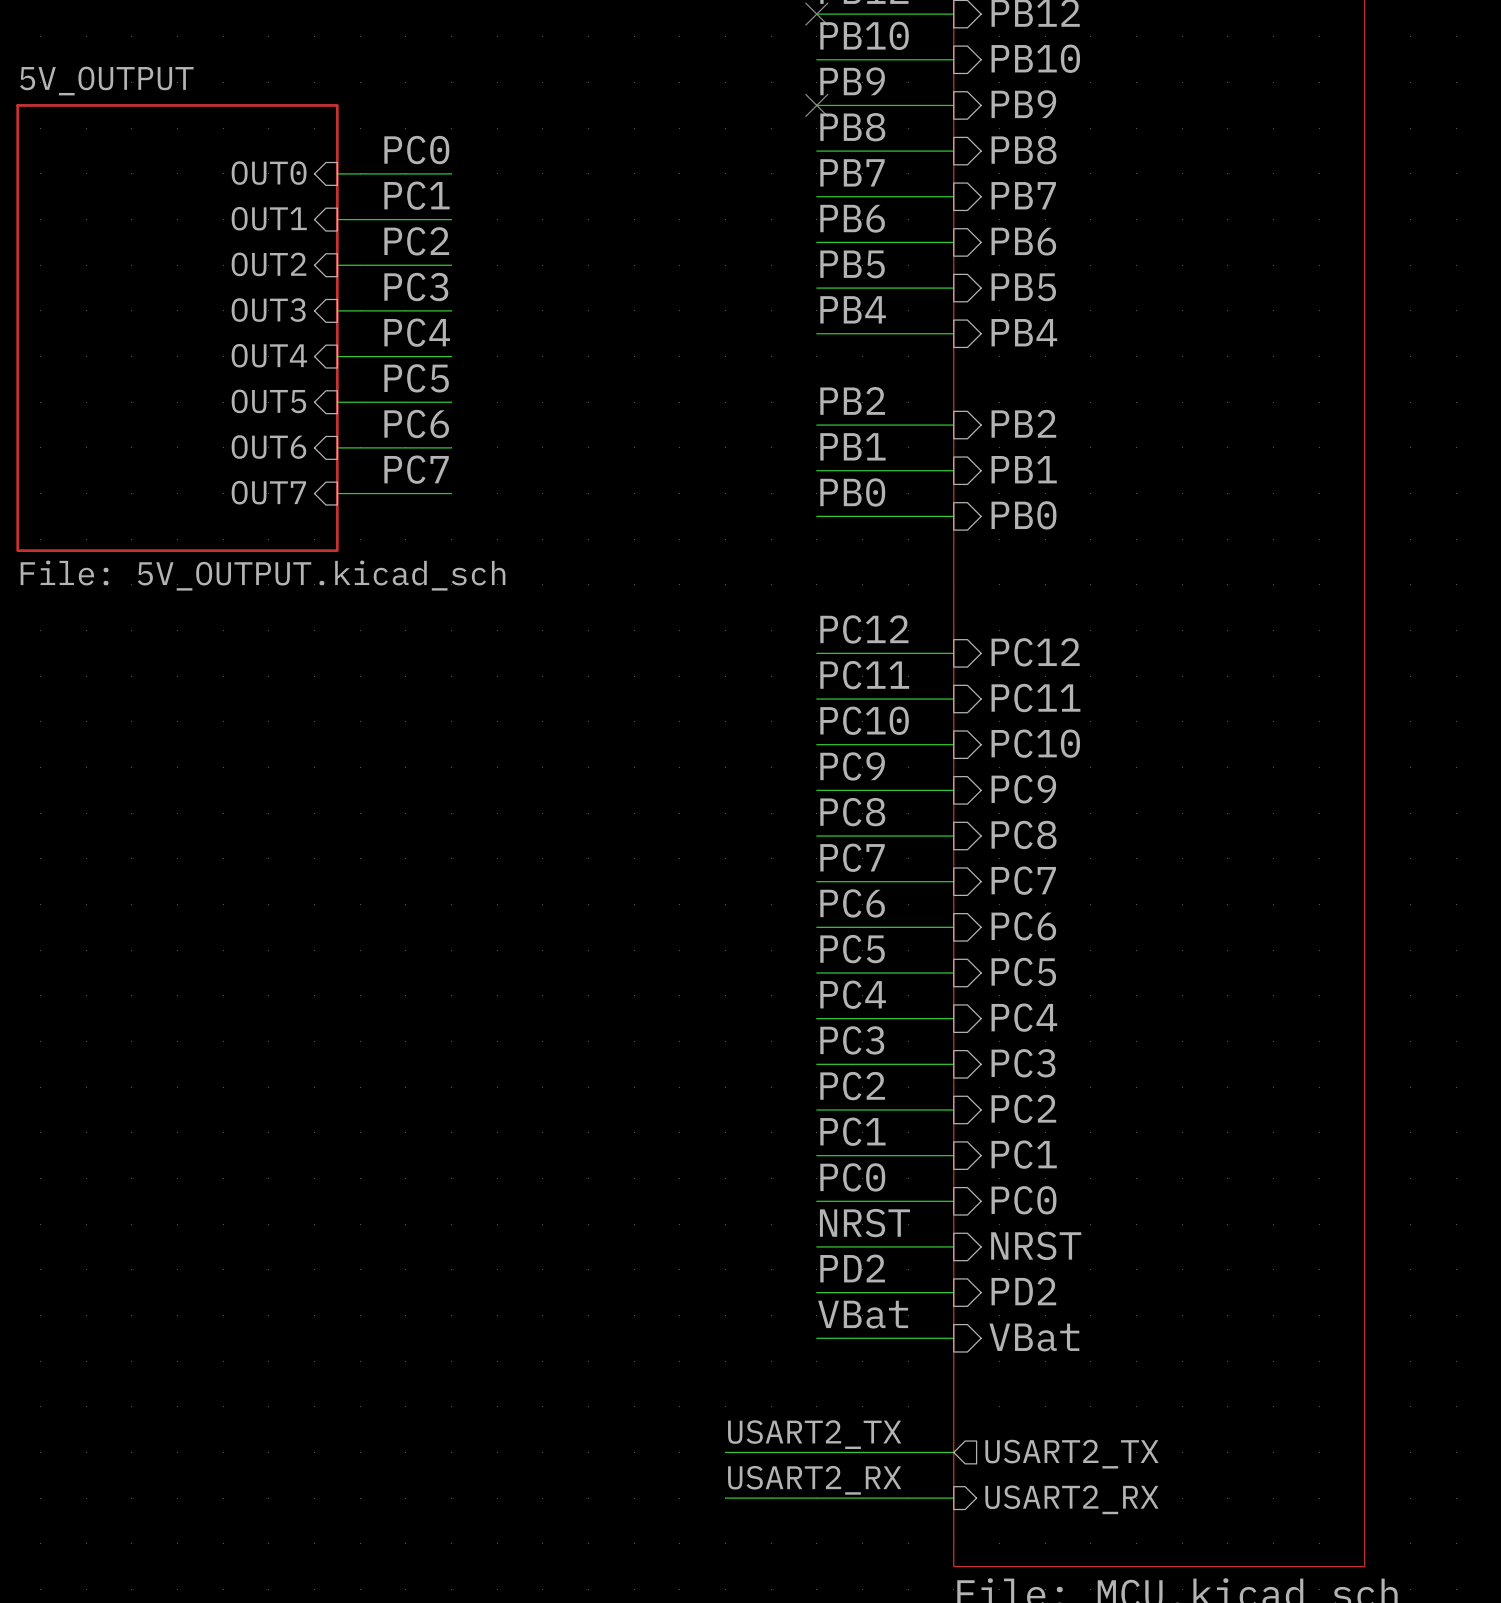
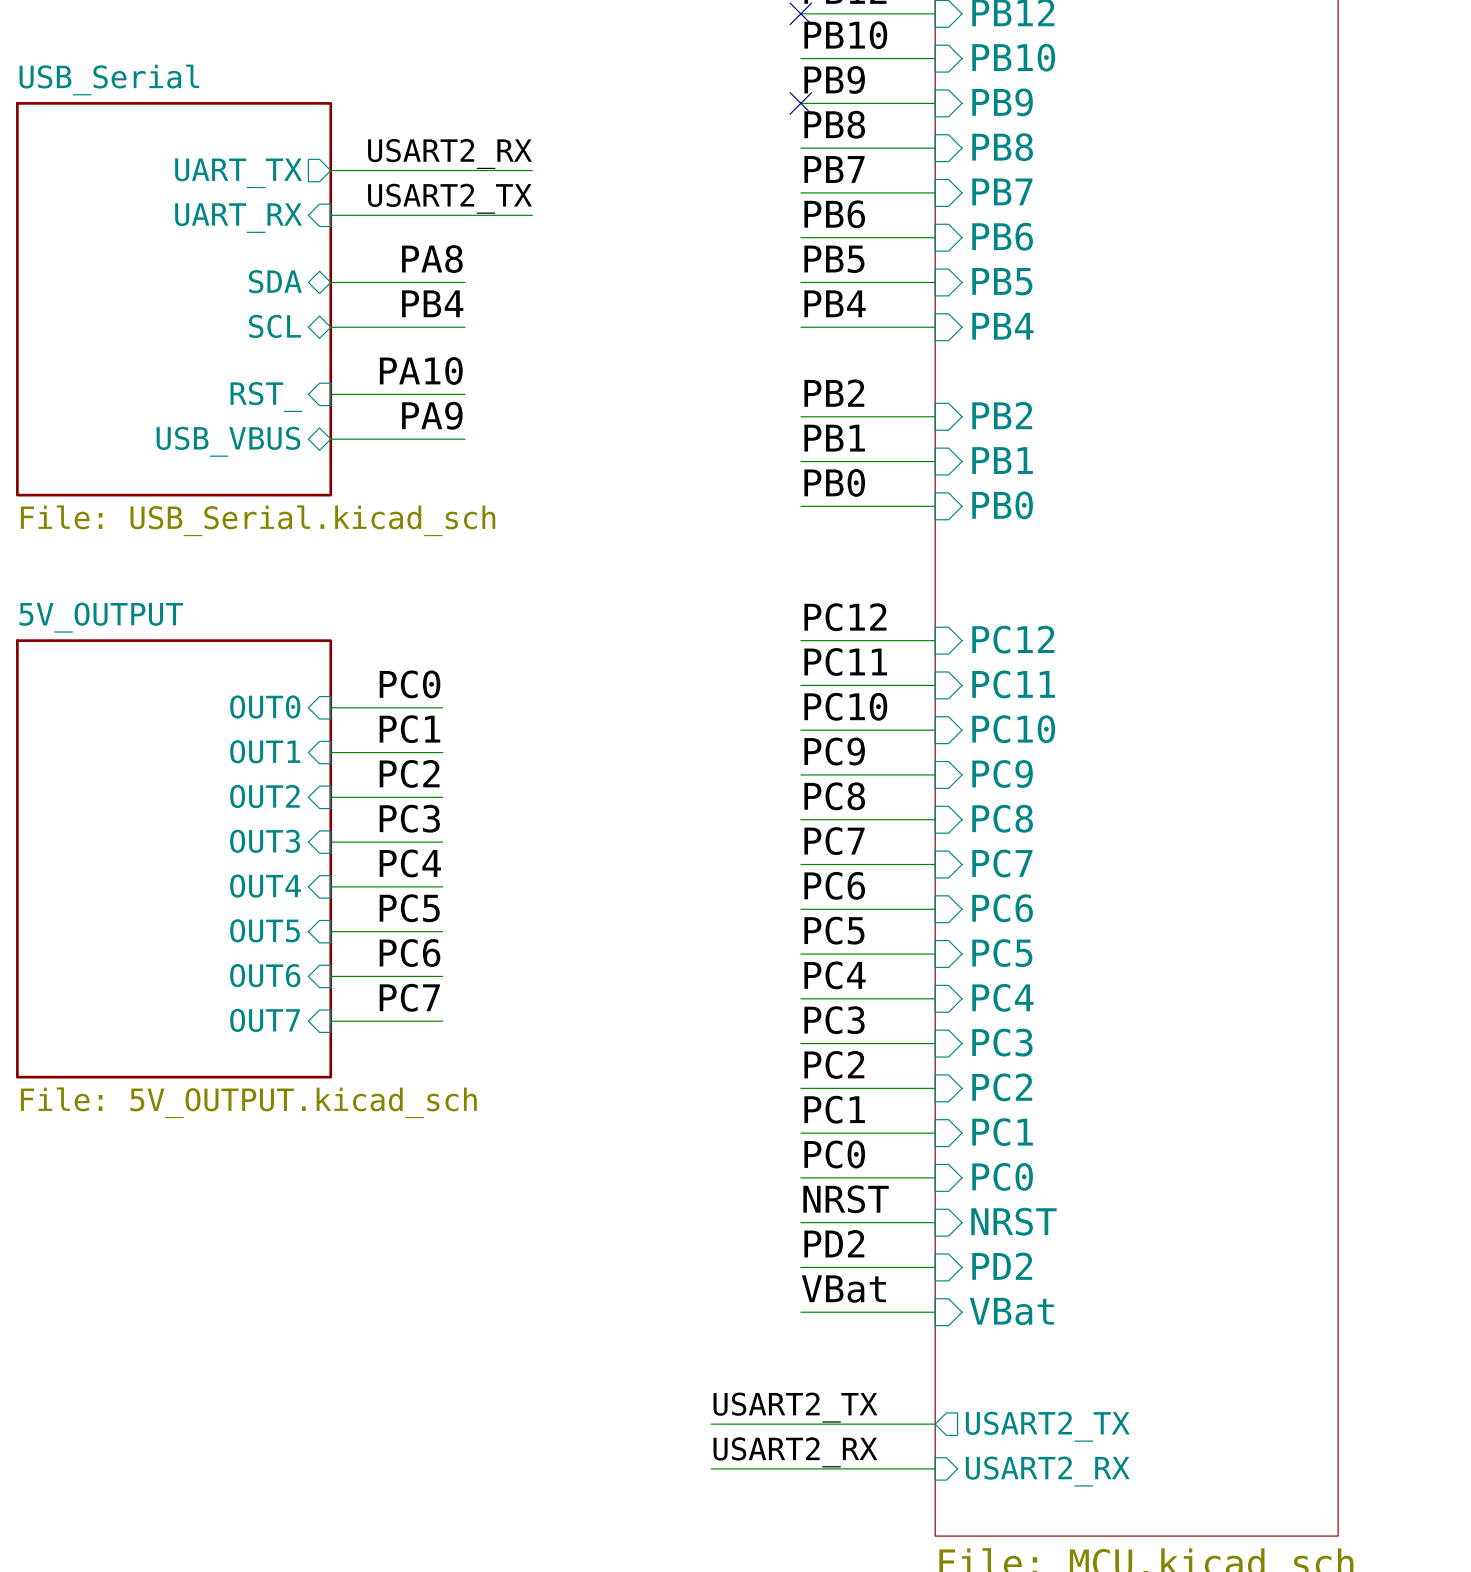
label: PC0 (416, 150) -> none
label: none -> USART2_RX (450, 153)
sheet pin shape: input (269, 173) -> output (238, 173)
sheet pin: OUT0 (269, 173) -> UART_TX (238, 173)
wire: none -> (442, 170) (532, 170)
label: PC1 (417, 195) -> none
label: none -> USART2_TX (450, 198)
sheet pin: OUT1 (269, 218) -> UART_RX (238, 218)
wire: none -> (442, 215) (532, 215)
label: PC2 (416, 241) -> none
sheet pin: OUT2 (268, 264) -> none
label: none -> PA8 (432, 259)
wire: (337, 265) (451, 265) -> none
sheet pin: none -> SDA (275, 281)
label: PC3 (416, 287) -> none
wire: none -> (330, 282) (465, 282)
sheet USB_Serial: none -> File: USB_Serial.kicad_sch (174, 299)
sheet pin: OUT3 (268, 310) -> none
wire: (337, 310) (451, 310) -> (330, 707) (442, 707)
sheet 5V_OUTPUT position: (177, 328) -> (174, 858)
sheet pin: none -> SCL (274, 326)
label: PC4 (417, 332) -> PB4 (432, 303)
wire: none -> (330, 327) (465, 327)
sheet pin: OUT4 (269, 355) -> none
wire: (337, 356) (451, 356) -> (330, 752) (442, 752)
label: PC5 (416, 378) -> none
label: none -> PA10 (421, 370)
sheet pin: OUT5 (268, 401) -> RST_ (266, 396)
wire: none -> (442, 394) (465, 394)
label: PC6 (416, 423) -> none
label: none -> PA9 (432, 415)
sheet pin shape: input (268, 447) -> bidirectional (228, 441)
sheet pin: OUT6 (268, 447) -> USB_VBUS (228, 441)
wire: none -> (442, 439) (465, 439)
label: PC7 (416, 469) -> none
sheet pin: OUT7 (268, 492) -> none
wire: (337, 493) (451, 493) -> (330, 886) (442, 886)
label: none -> PC0 (410, 684)
sheet pin: none -> OUT0 (265, 706)
label: none -> PC1 (409, 729)
sheet pin: none -> OUT1 (265, 751)
label: none -> PC2 (409, 773)
sheet pin: none -> OUT2 (264, 796)
wire: none -> (330, 797) (442, 797)
label: none -> PC3 (409, 818)
sheet pin: none -> OUT3 (265, 841)
wire: none -> (330, 842) (442, 842)
label: none -> PC4 (410, 863)
sheet pin: none -> OUT4 (265, 886)
label: none -> PC5 (409, 908)
sheet pin: none -> OUT5 (265, 930)
wire: none -> (330, 931) (442, 931)
label: none -> PC6 (410, 953)
sheet pin: none -> OUT6 (265, 975)
wire: none -> (330, 976) (442, 976)
label: none -> PC7 (409, 997)
sheet pin: none -> OUT7 (265, 1020)
wire: none -> (330, 1021) (442, 1021)

